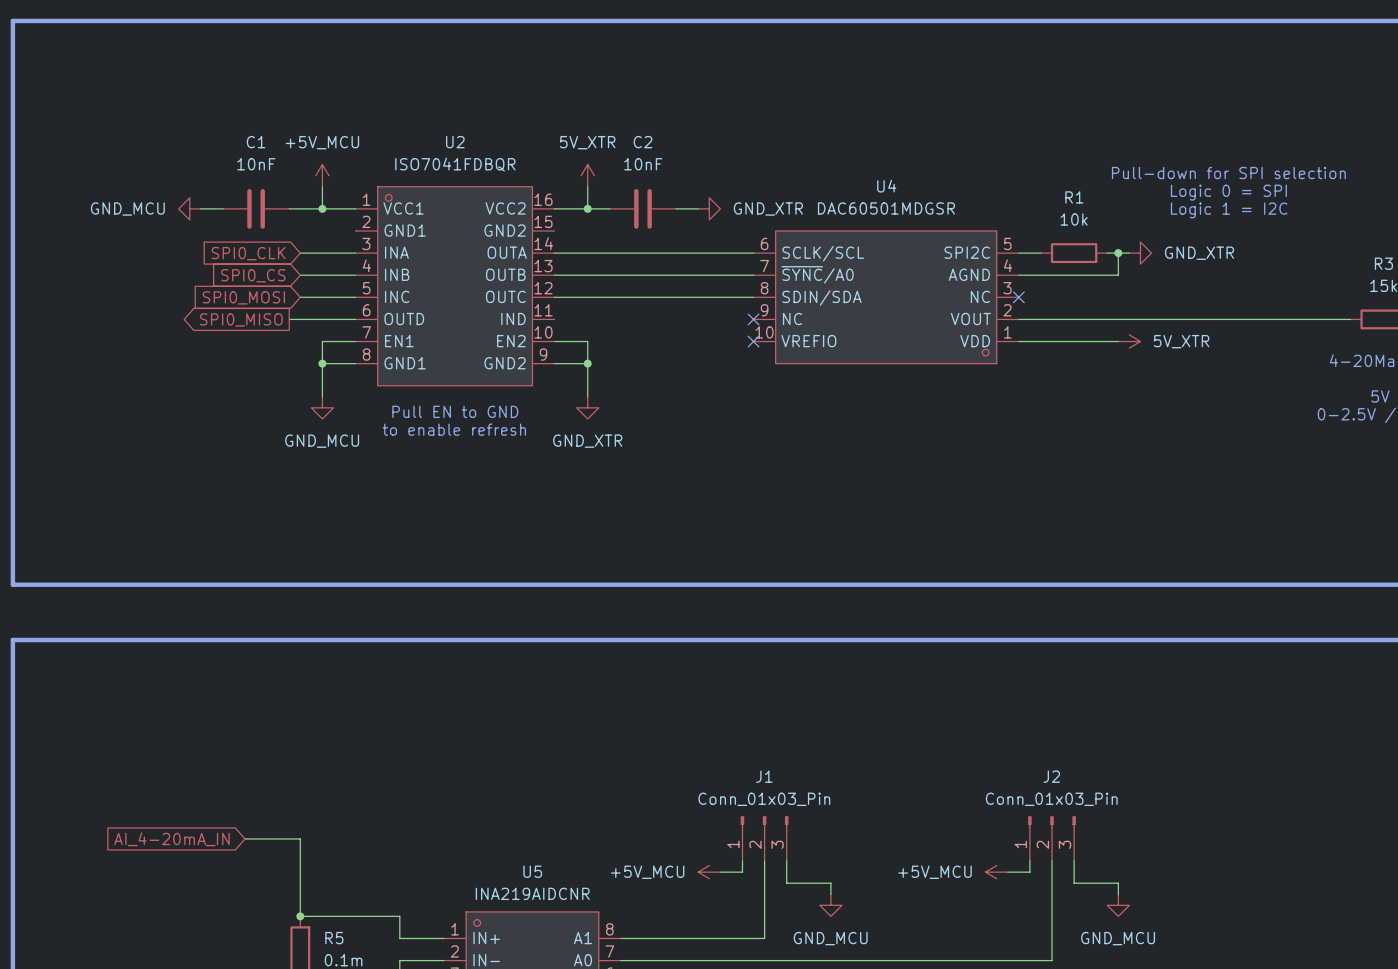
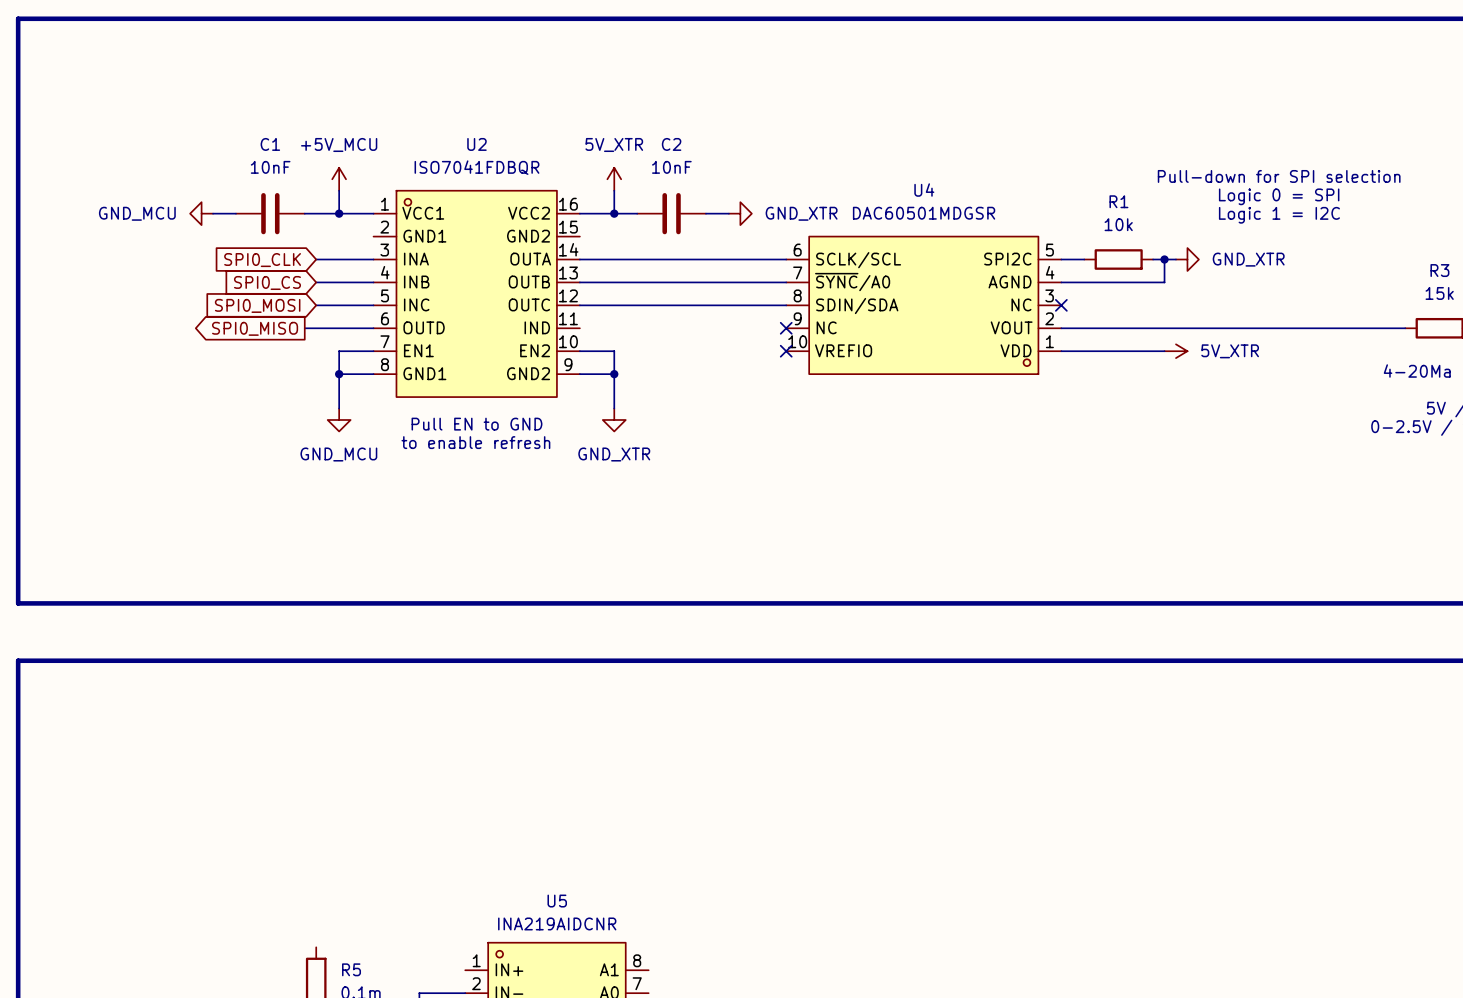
wire: (245, 838) (300, 838) (300, 916) (399, 916) (399, 938) (444, 938) -> none
J1: Conn_01x03_Pin (764, 838) -> none
J2: Conn_01x03_Pin (1052, 838) -> none
global label: AI_4-20mA_IN (171, 839) -> none
wire: (742, 861) (742, 872) (720, 872) -> none
wire: (764, 861) (764, 938) (620, 938) -> none
wire: (786, 861) (786, 883) (830, 883) (830, 894) -> none
wire: (1029, 861) (1029, 872) (1007, 872) -> none
wire: (1052, 861) (1052, 960) (620, 960) -> none
wire: (1074, 861) (1074, 883) (1118, 883) (1118, 894) -> none
power symbol: +5V_MCU (709, 872) -> none
power symbol: +5V_MCU (996, 872) -> none
power symbol: GND_MCU (830, 905) -> none
power symbol: GND_MCU (1118, 905) -> none
junction: (300, 916) -> none

